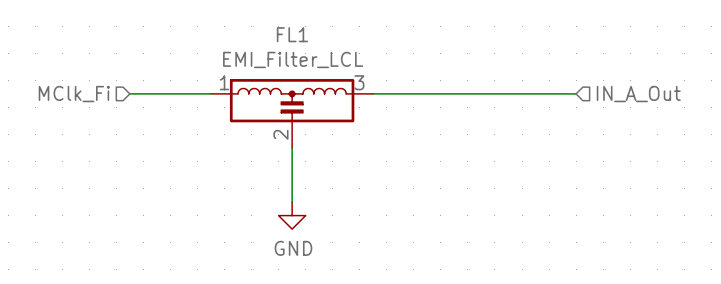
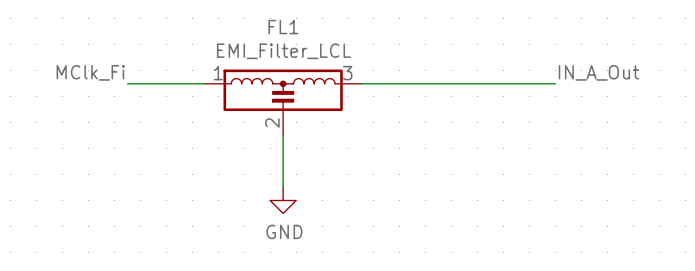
label: none -> MClk_Fi (90, 72)
label: none -> IN_A_Out (599, 72)
hierarchical label: MClk_Fi (74, 94) -> none
hierarchical label: IN_A_Out (638, 94) -> none

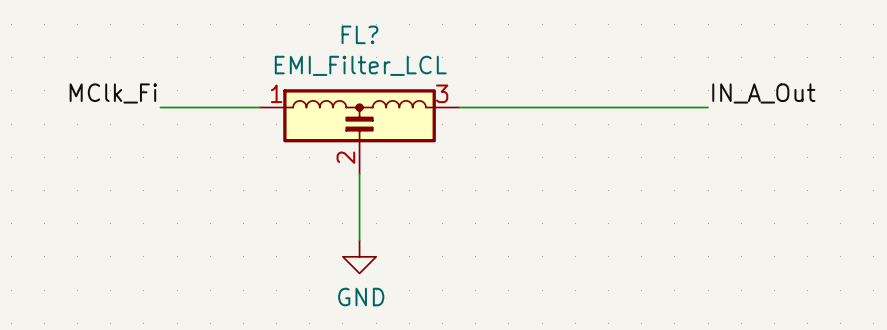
FL1 name: FL1 (283, 27) -> FL? (359, 34)

